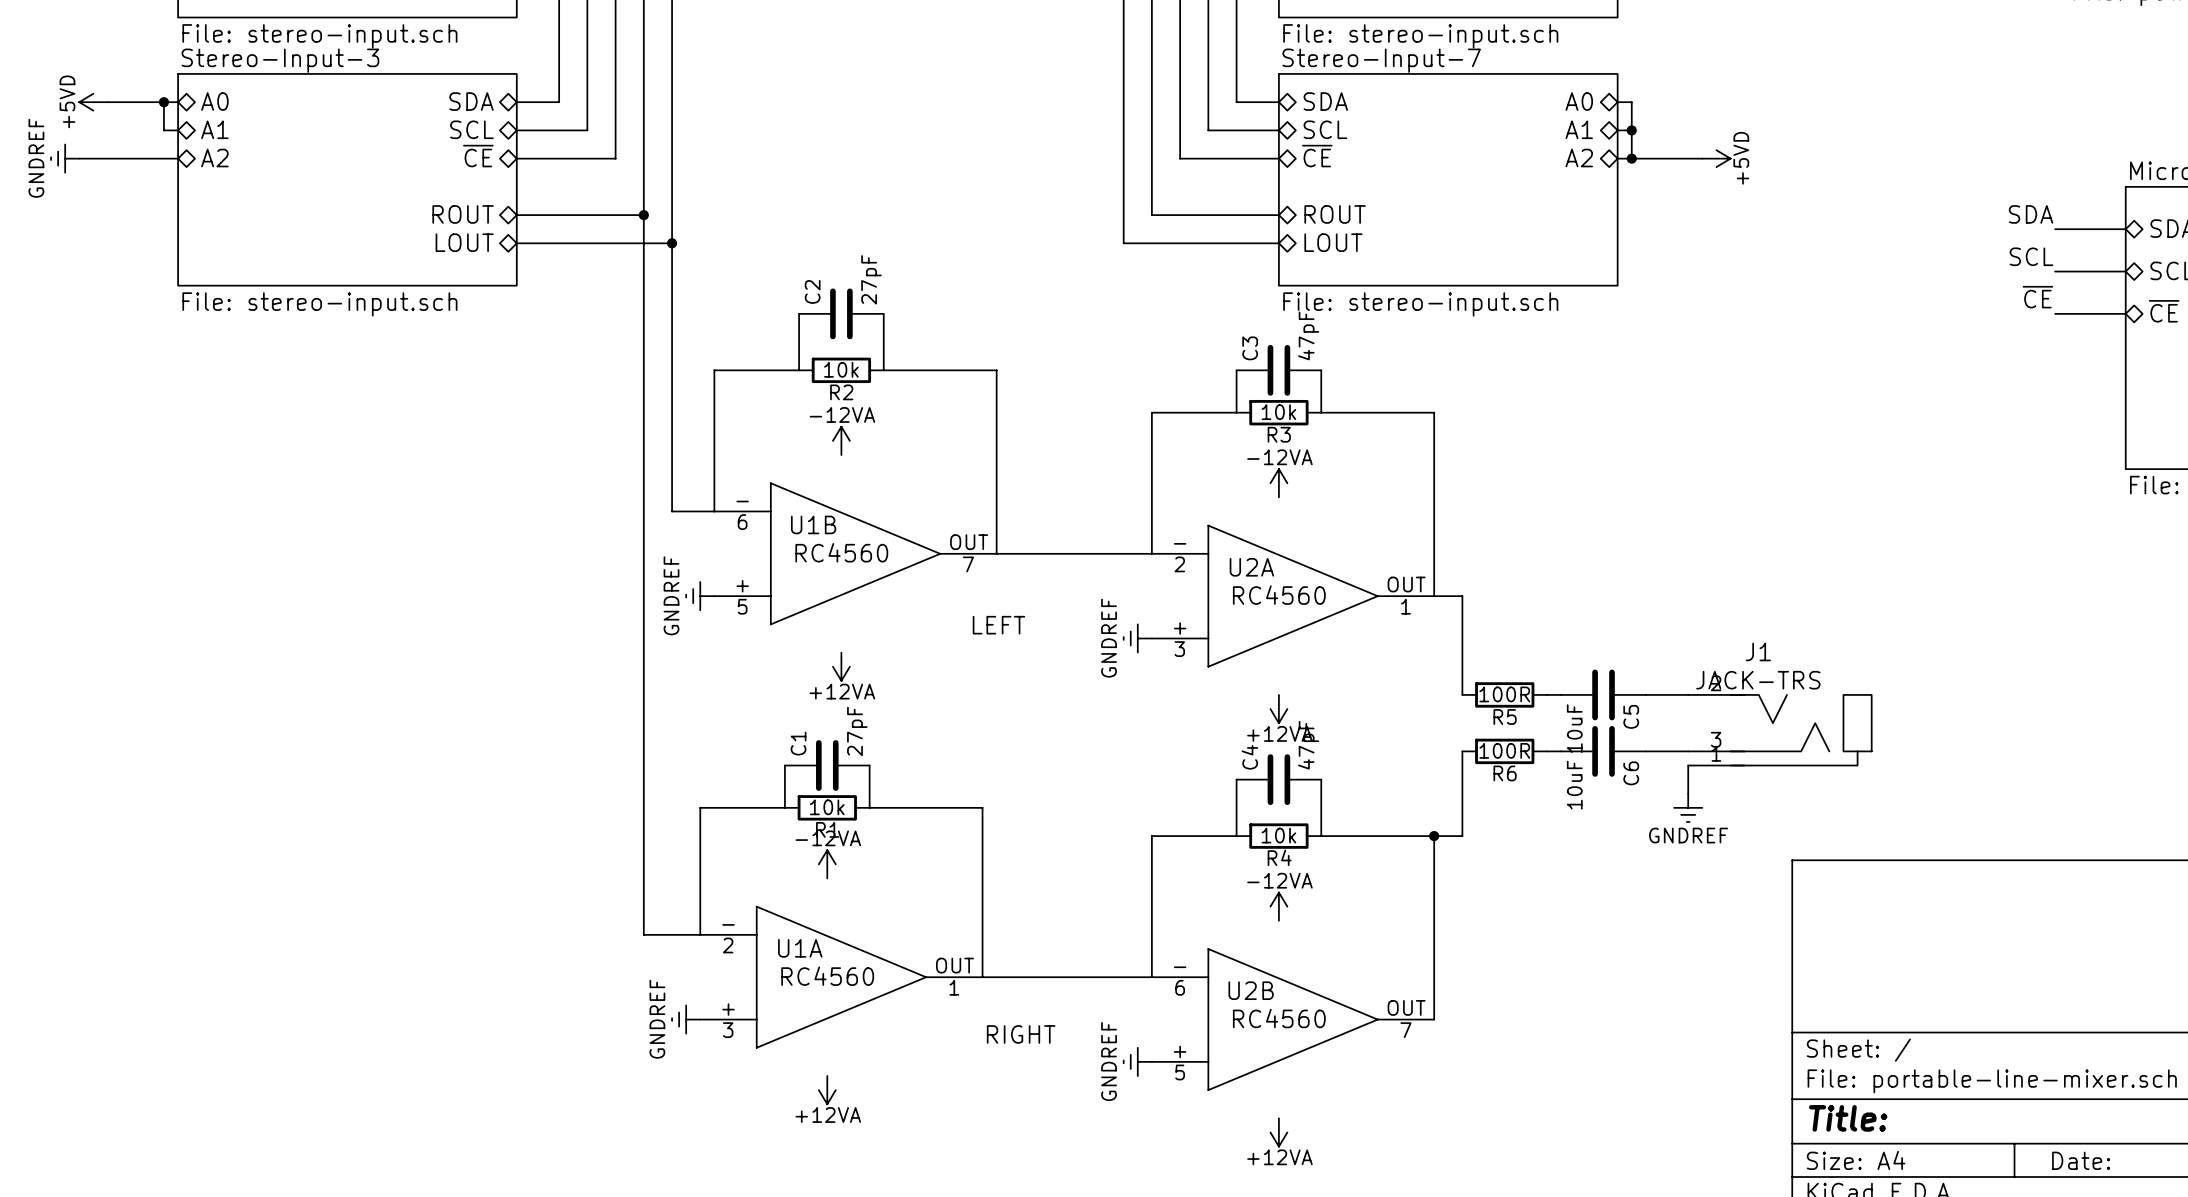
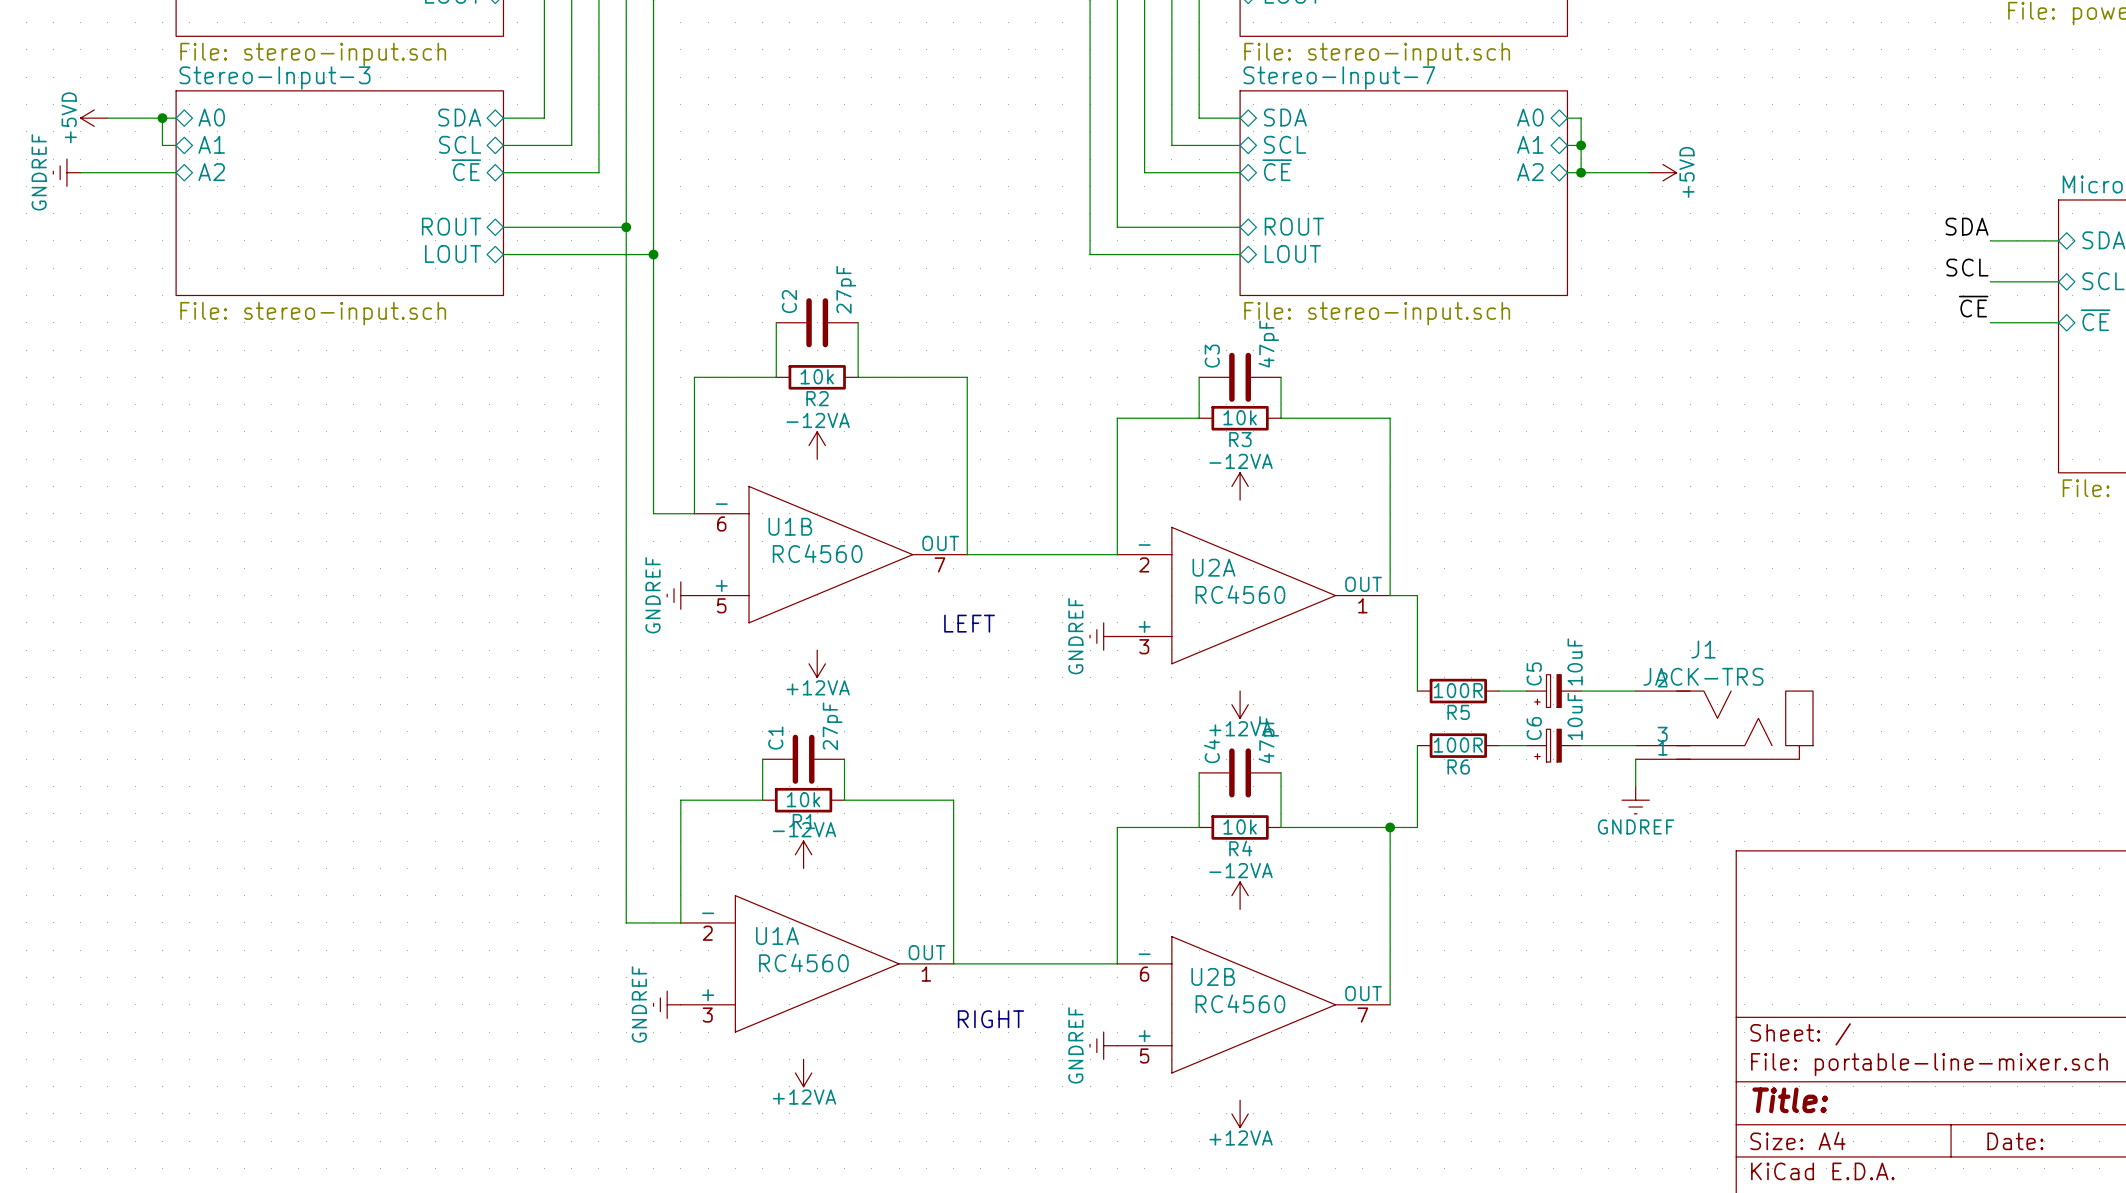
C5 symbol: [1561, 669, 1646, 721] -> [1526, 674, 1582, 708]
C5 name position: C5 (1631, 716) -> C5 (1534, 673)
C6 symbol: [1561, 726, 1646, 777] -> [1526, 729, 1582, 763]
C5 value position: 10uF (1574, 728) -> 10uF (1575, 661)
C6 name position: C6 (1631, 773) -> C6 (1534, 728)
C6 value position: 10uF (1574, 785) -> 10uF (1575, 716)

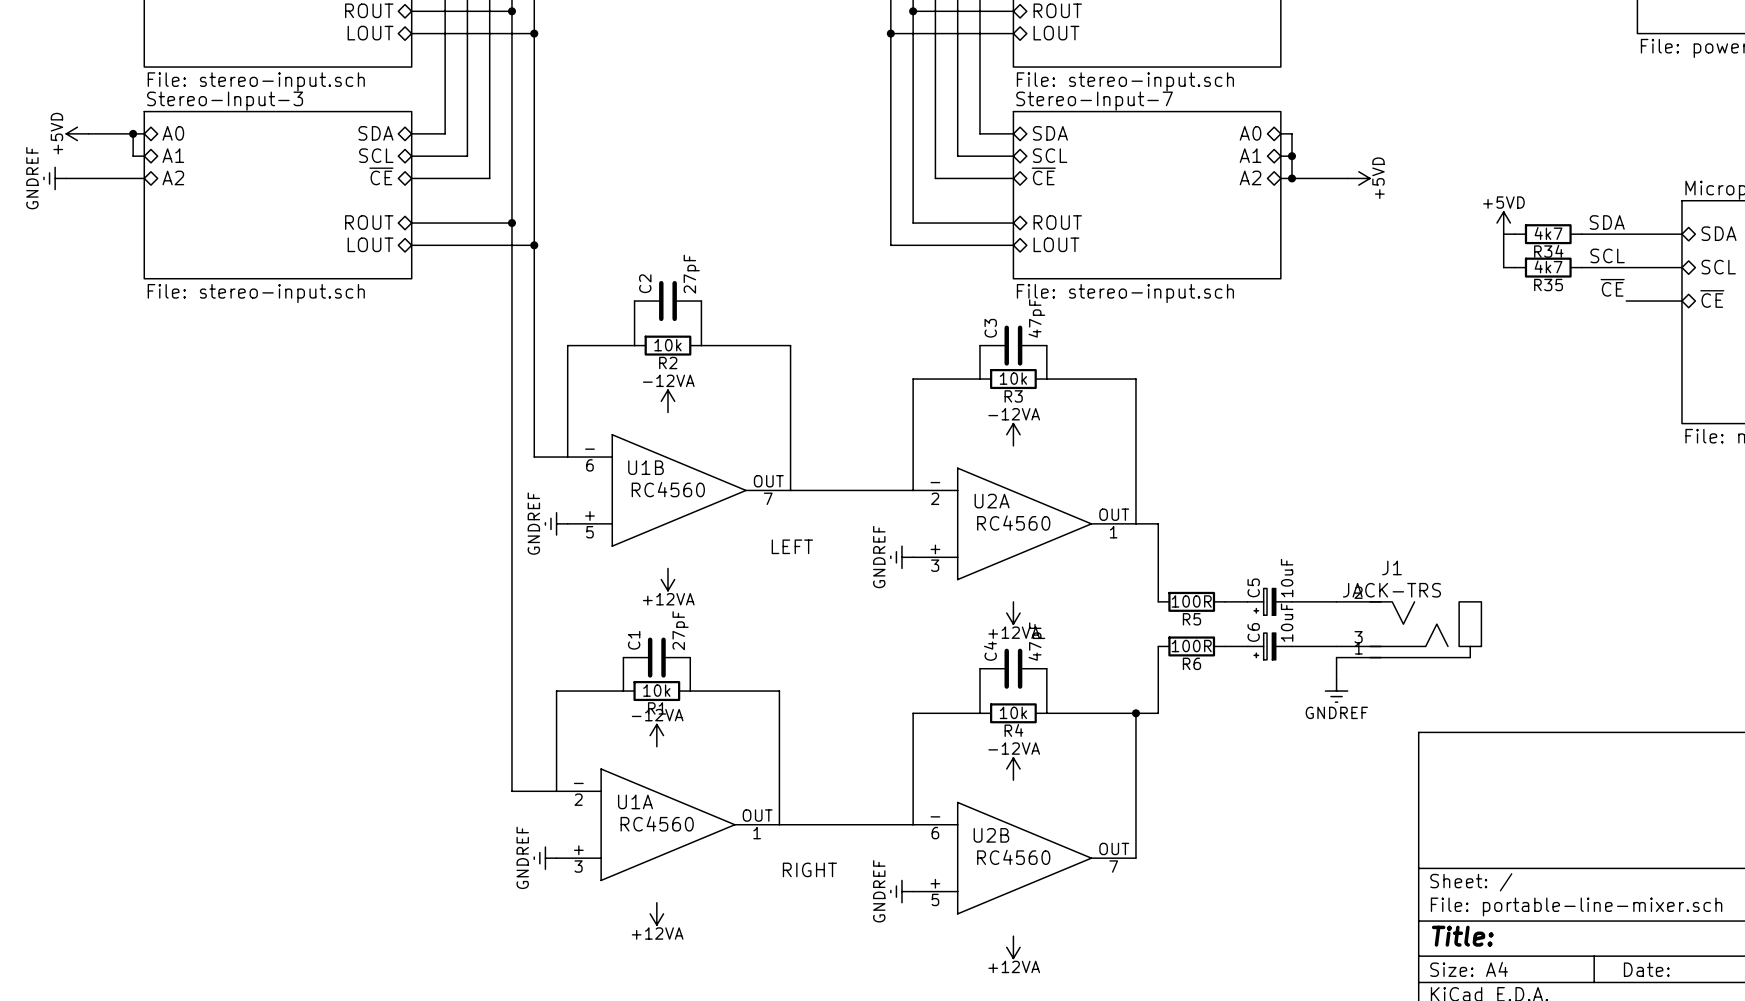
power symbol: none -> +5VD (1503, 223)
wire: none -> (1514, 234) (1503, 234) (1503, 267) (1514, 267)
R34: none -> 4k7 (1548, 234)
wire: none -> (1581, 234) (1626, 234)
R35: none -> 4k7 (1548, 267)
wire: none -> (1581, 267) (1626, 267)

